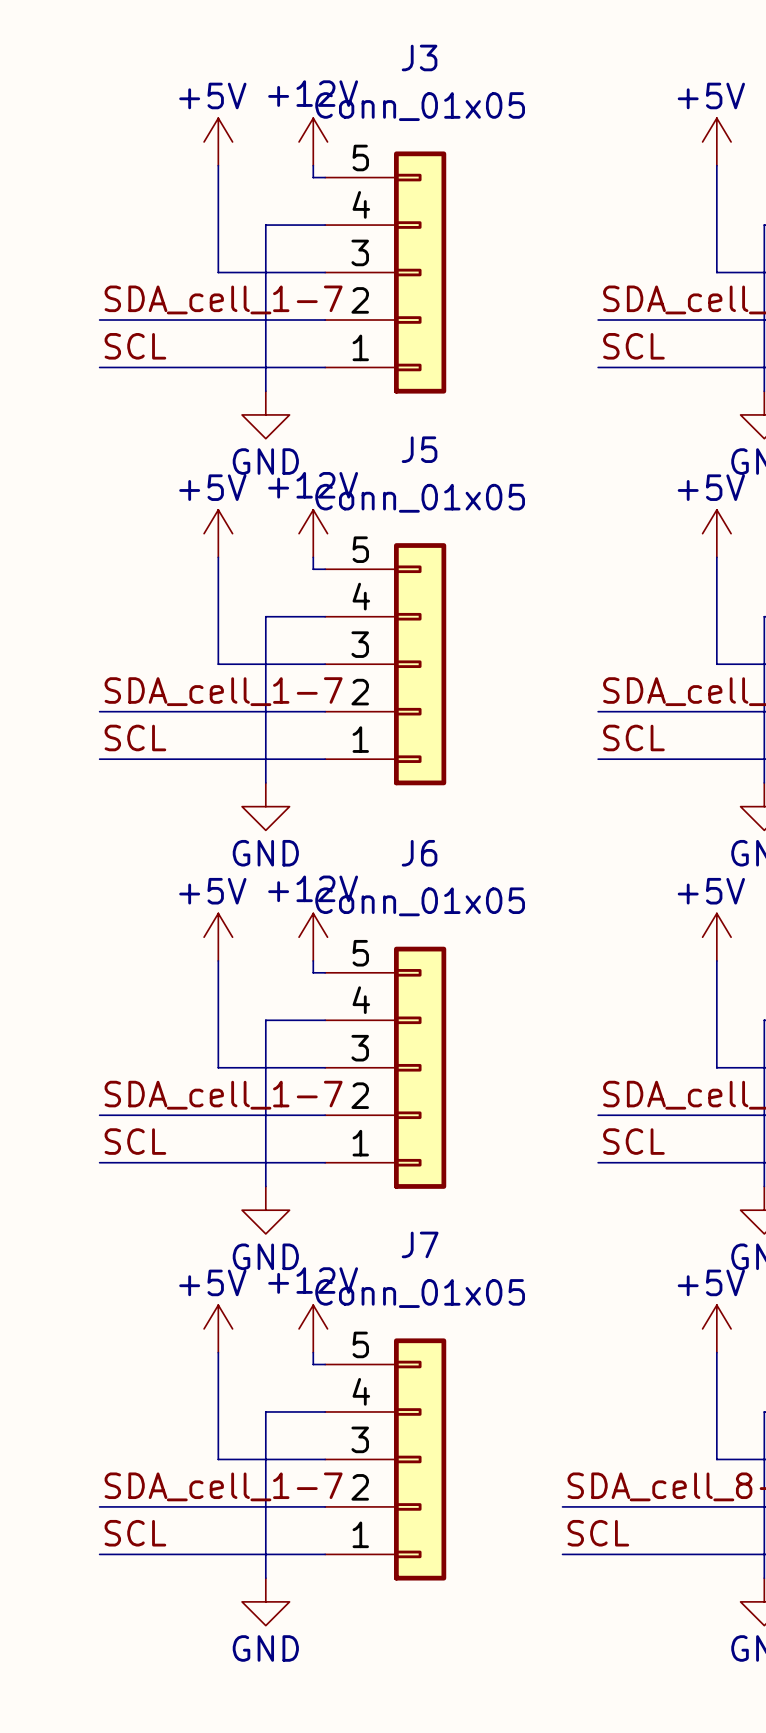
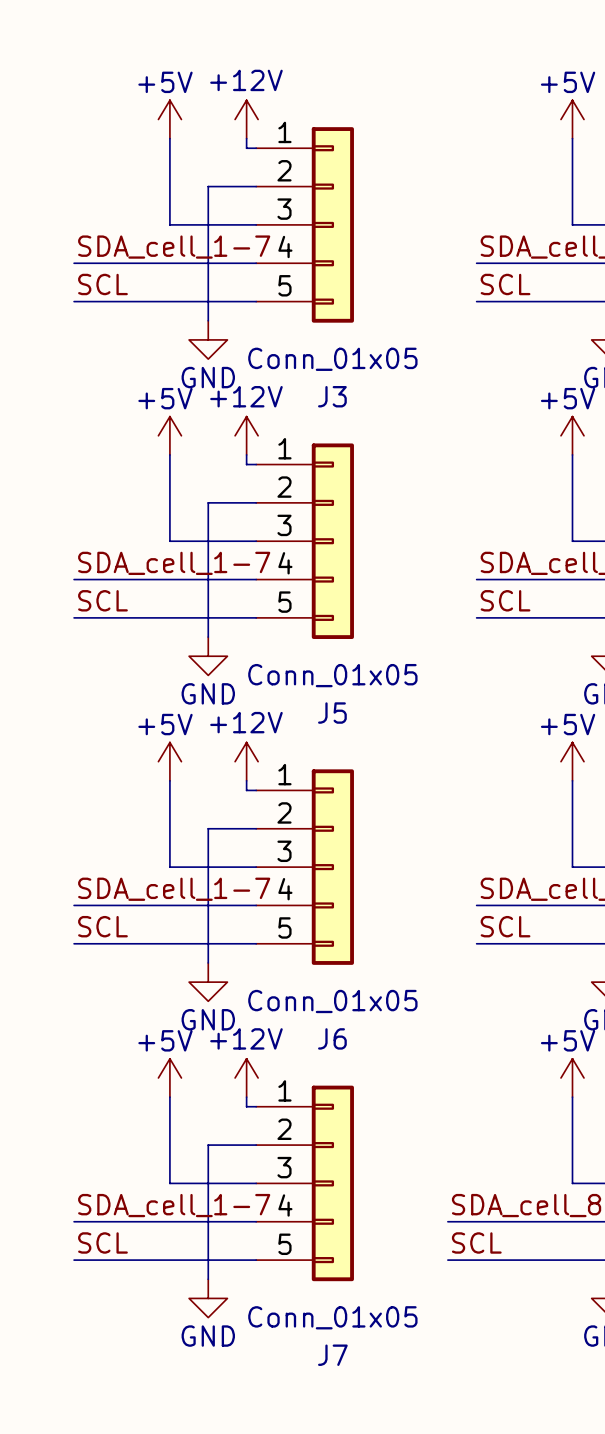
J3 flip: as is (420, 272) -> up-down (332, 224)
J5 flip: as is (420, 664) -> up-down (332, 541)
J6 flip: as is (420, 1067) -> up-down (332, 867)
J7 flip: as is (420, 1459) -> up-down (332, 1183)

